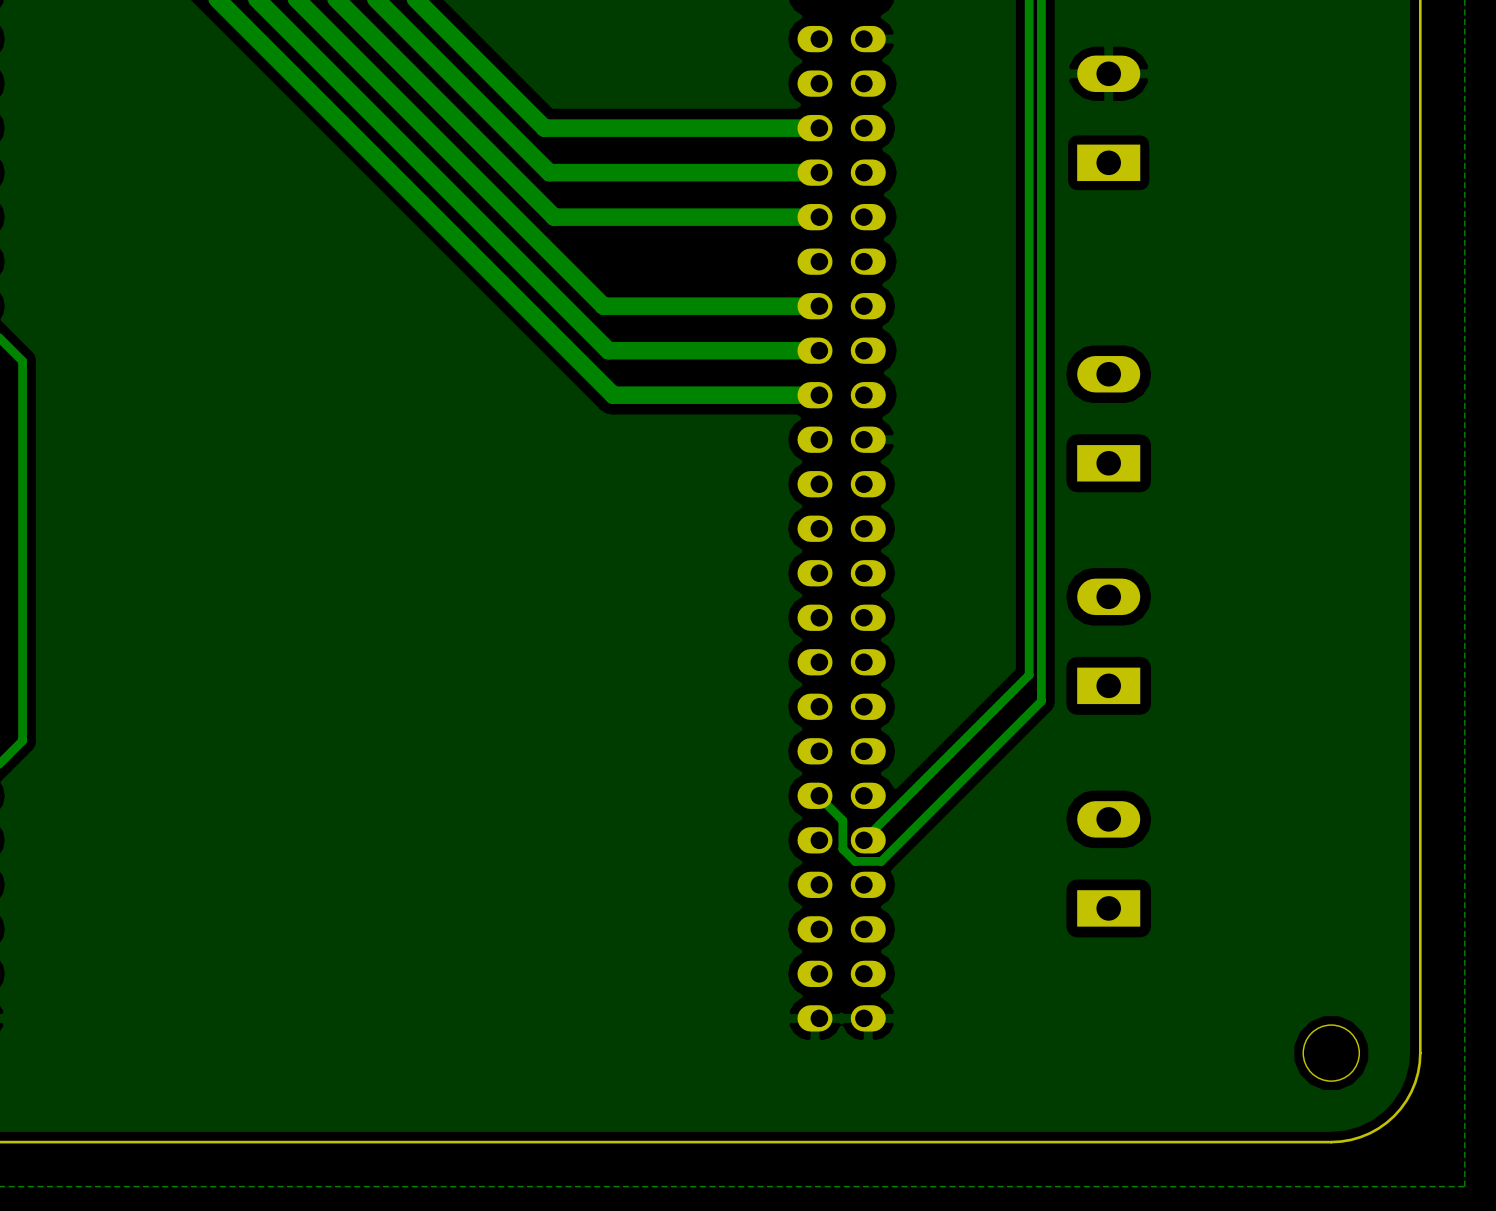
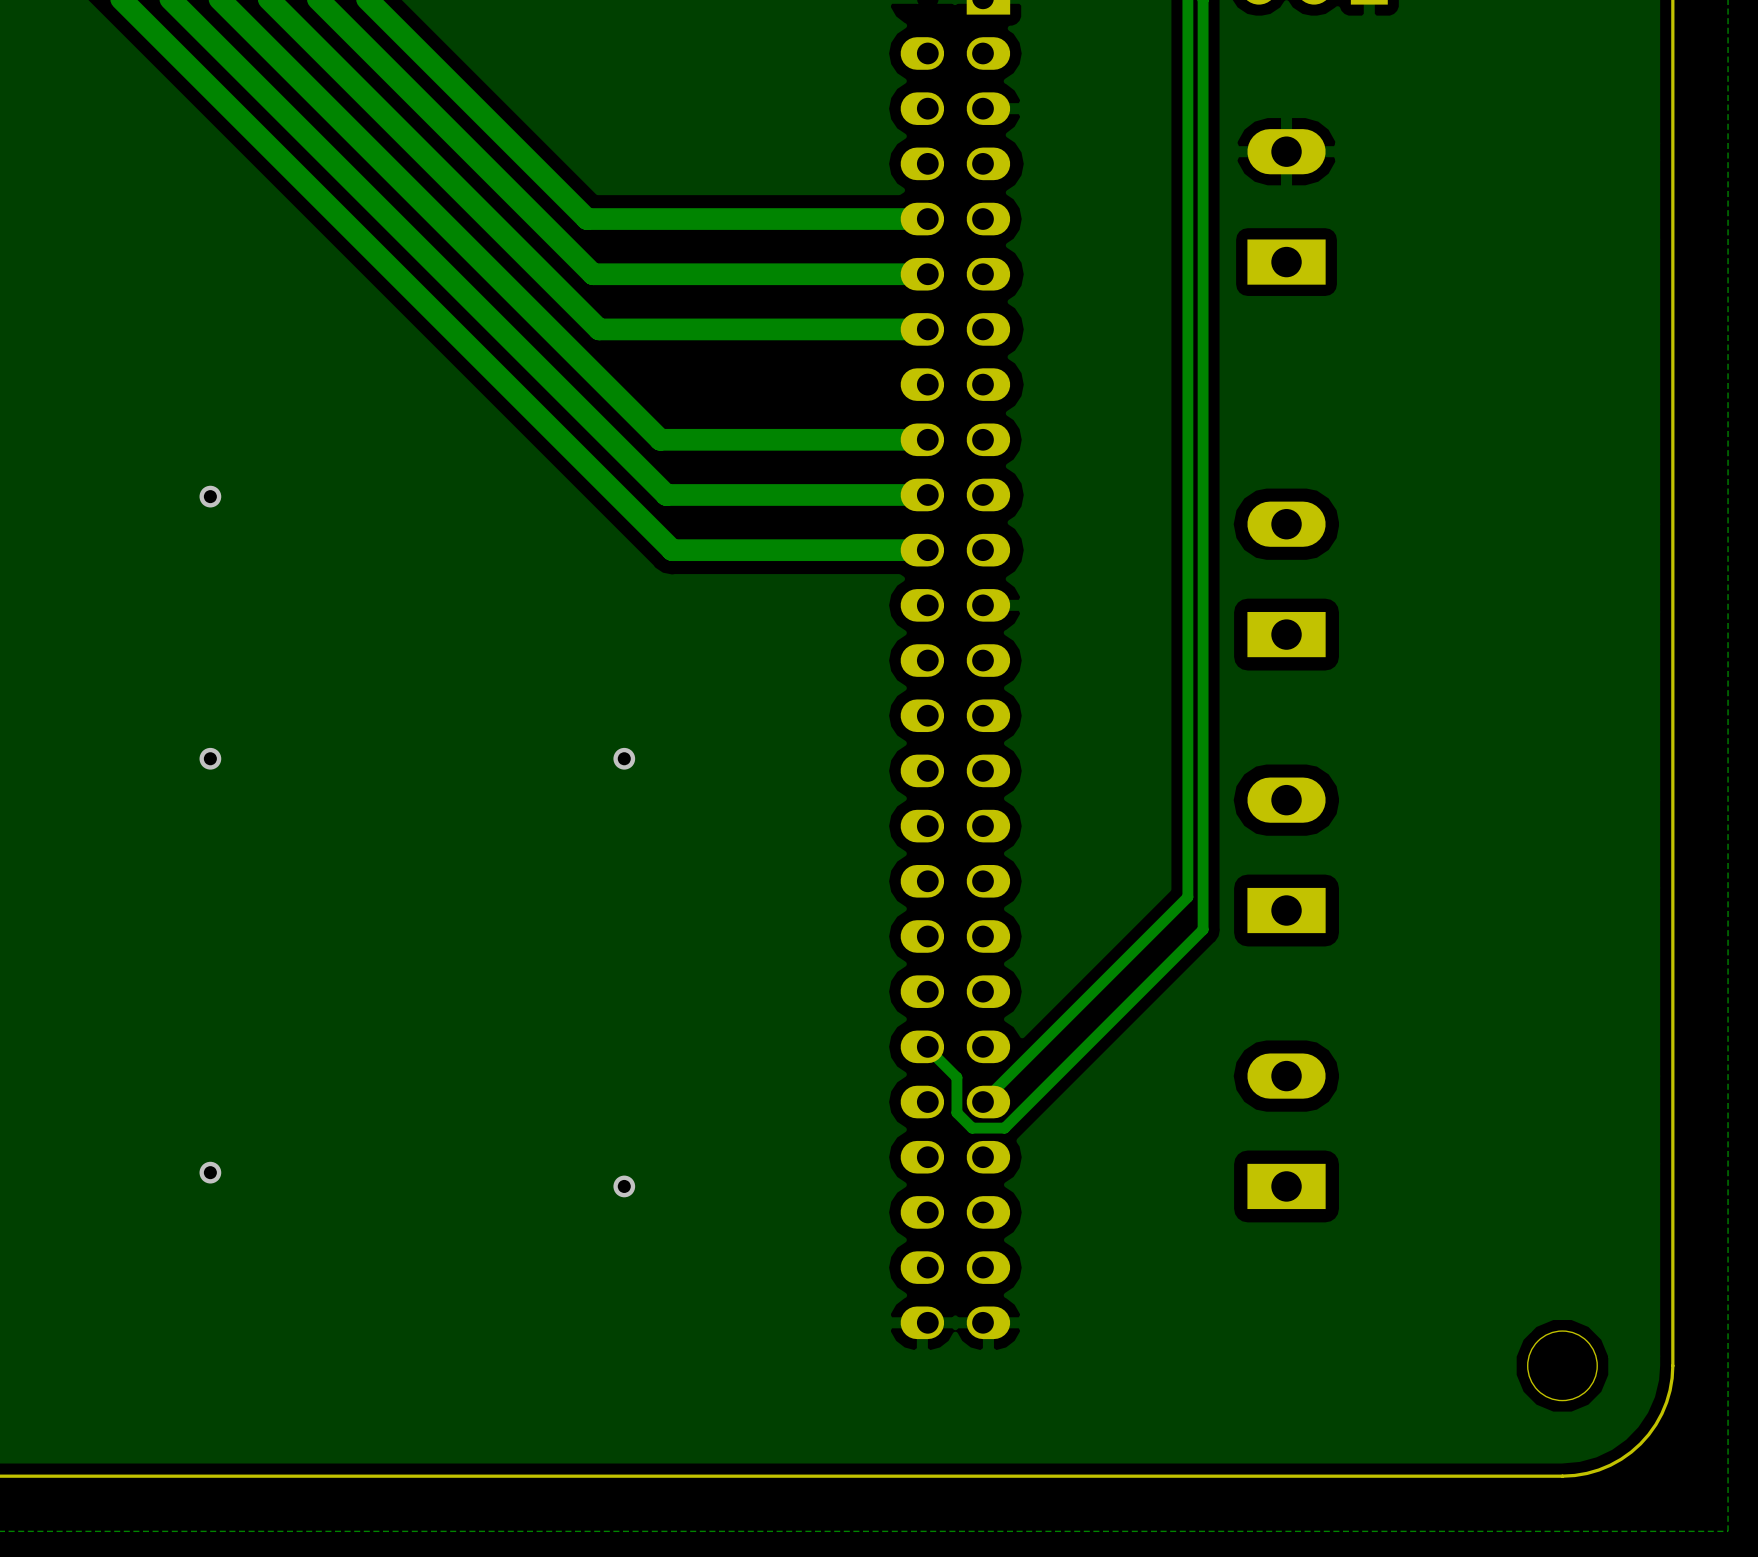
via: none -> (210, 496)
via: none -> (210, 758)
via: none -> (624, 758)
via: none -> (210, 1172)
via: none -> (624, 1186)

